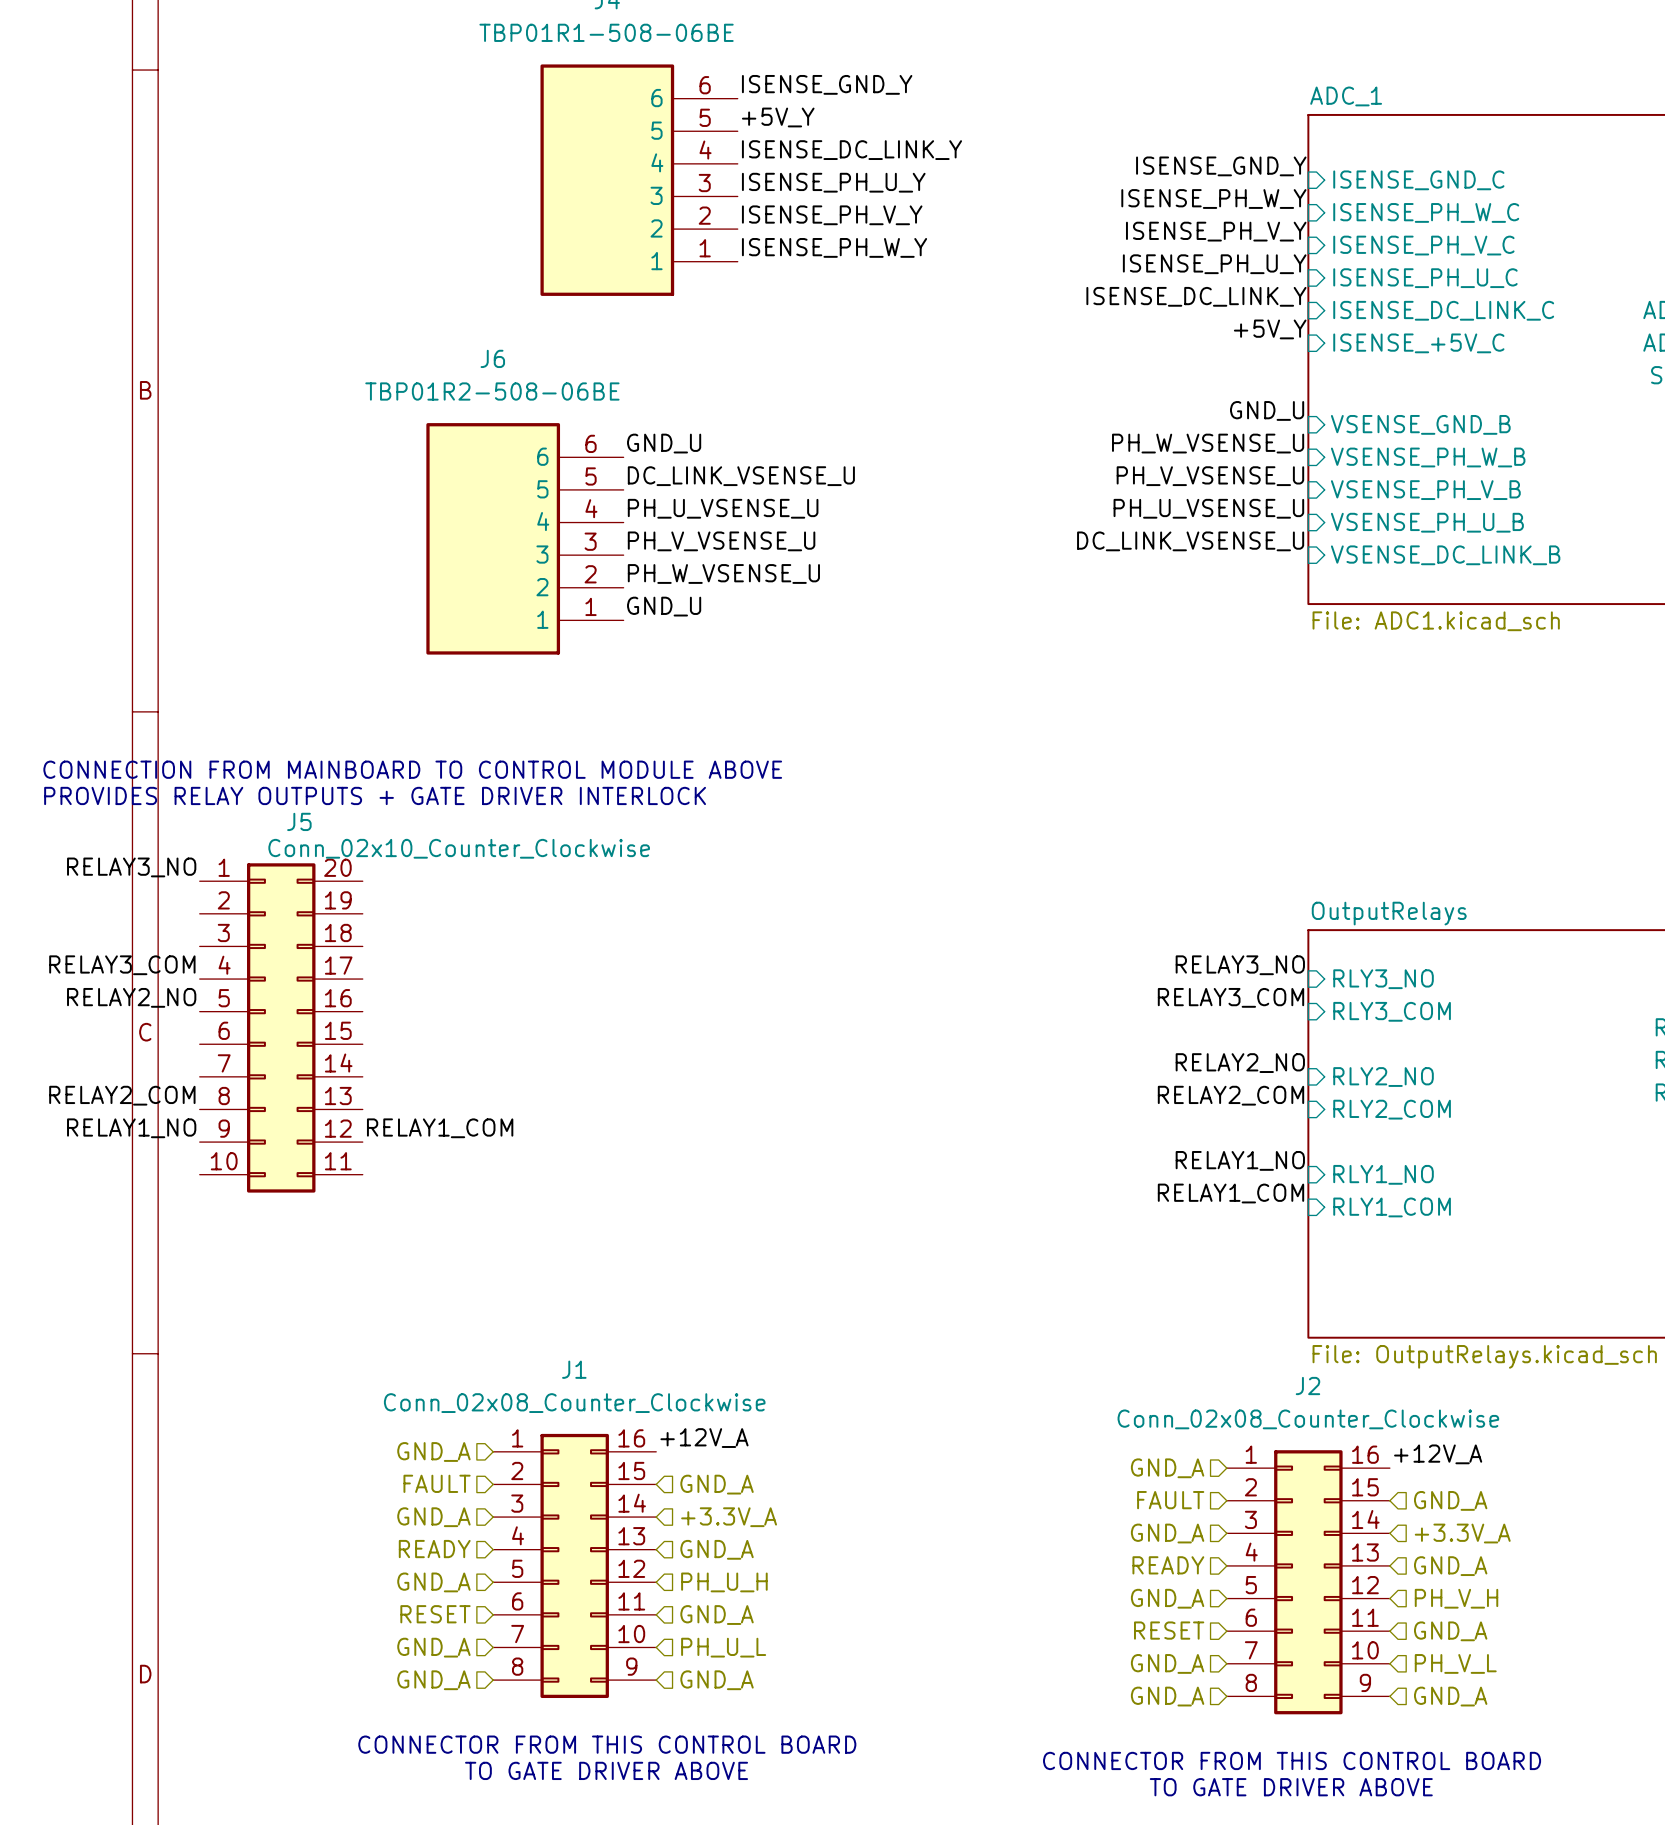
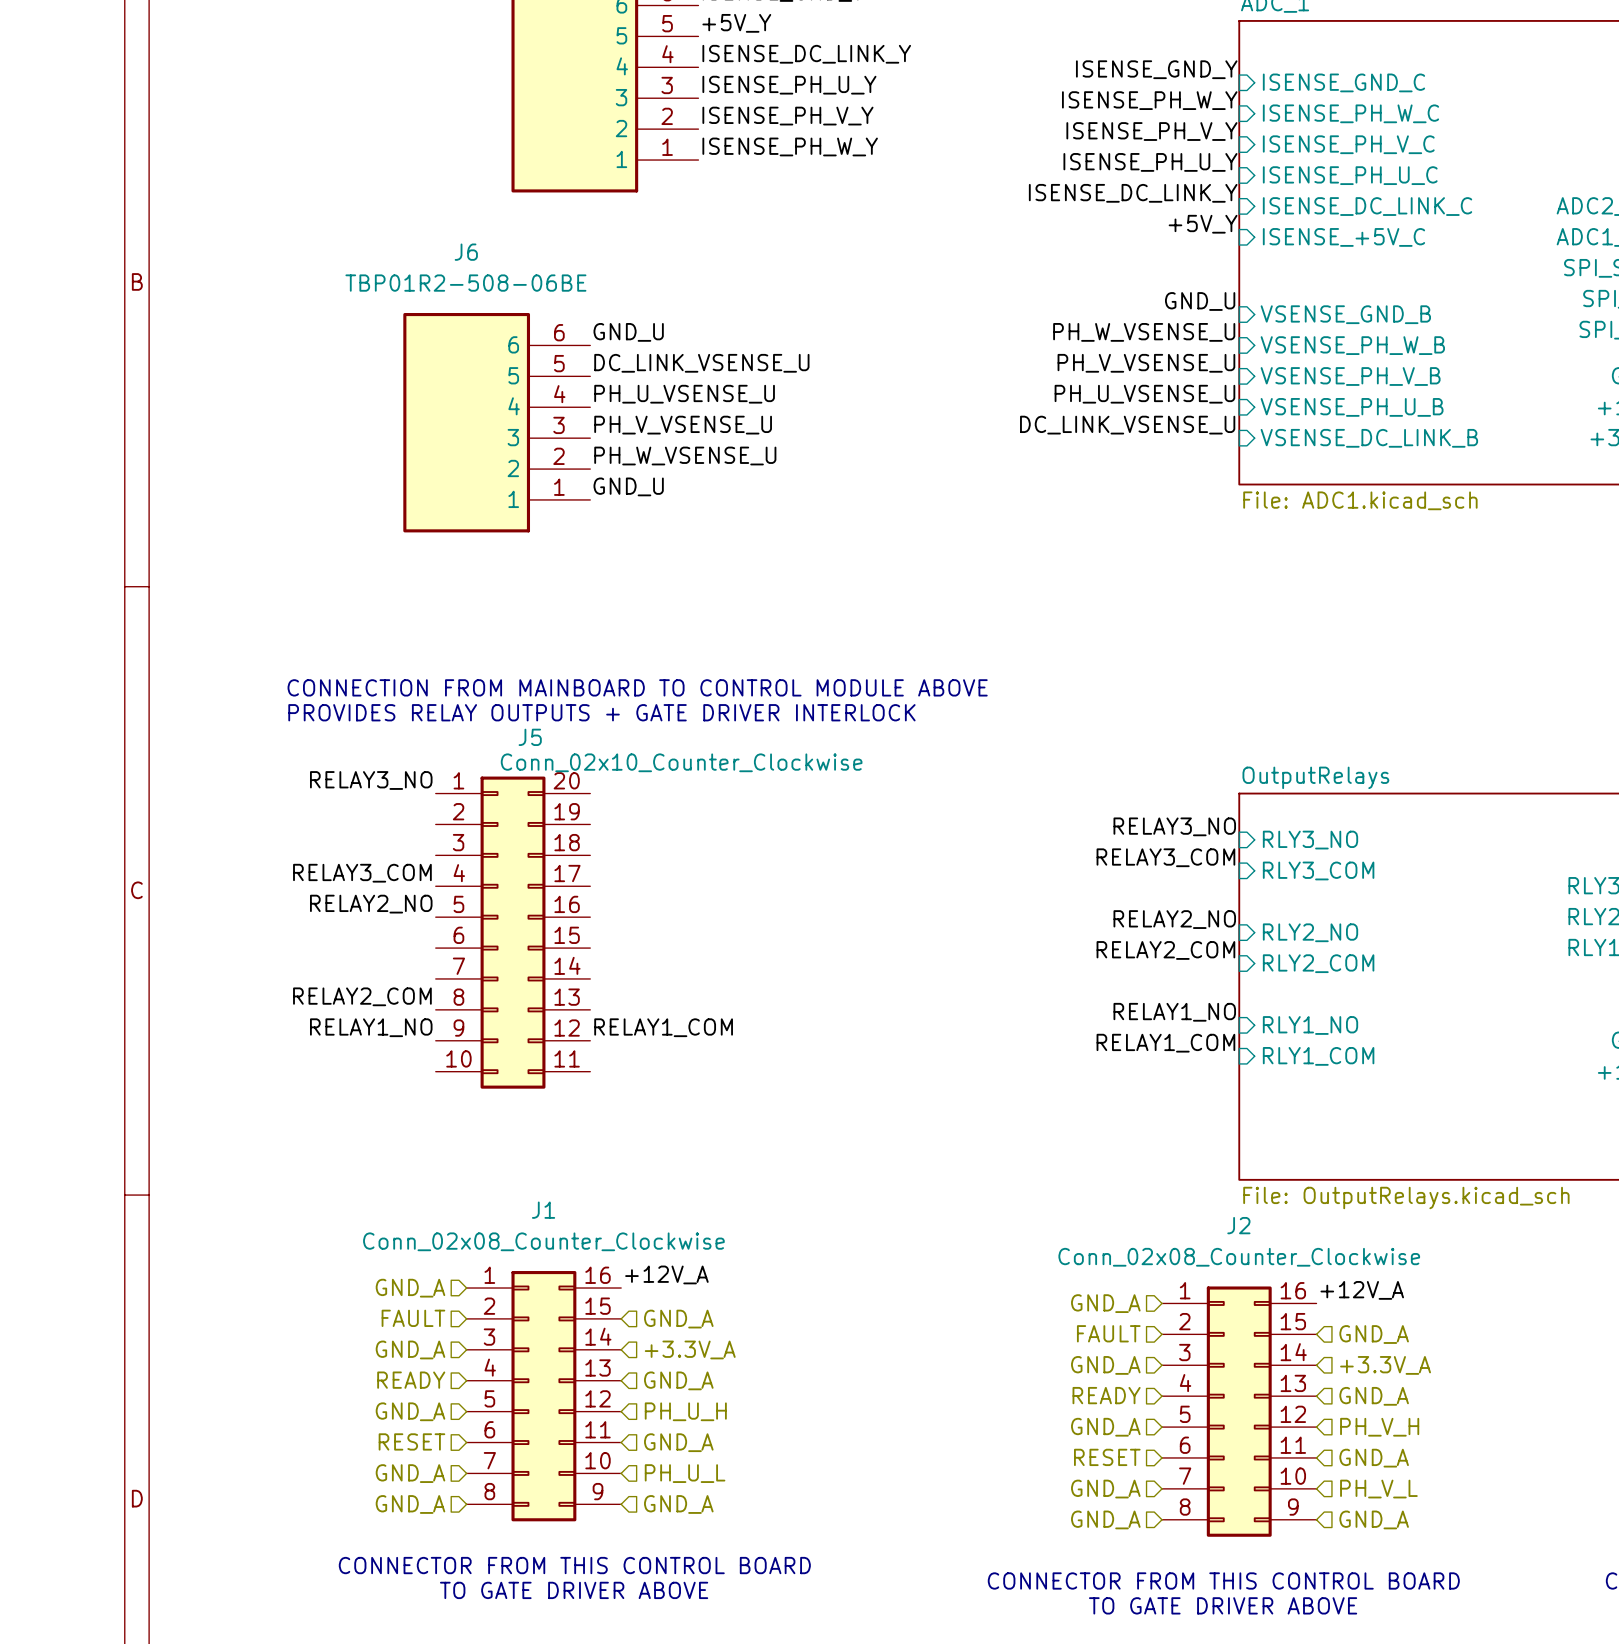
text position: CONNECTION FROM MAINBOARD TO CONTROL MODULE ABOVE (412, 769) -> CONNECTION FROM MAINBOARD TO CONTROL MODULE ABOVE (637, 687)
text position: PROVIDES RELAY OUTPUTS + GATE DRIVER INTERLOCK (375, 795) -> PROVIDES RELAY OUTPUTS + GATE DRIVER INTERLOCK (601, 712)
label position: RELAY3_NO (131, 867) -> RELAY3_NO (371, 780)
label position: RELAY3_COM (122, 965) -> RELAY3_COM (362, 873)
label position: RELAY2_NO (131, 997) -> RELAY2_NO (371, 904)
J5 position: (281, 1027) -> (513, 932)
label position: RELAY2_COM (122, 1095) -> RELAY2_COM (362, 996)
label position: RELAY1_NO (131, 1128) -> RELAY1_NO (371, 1027)
label position: RELAY1_COM (440, 1128) -> RELAY1_COM (663, 1027)

